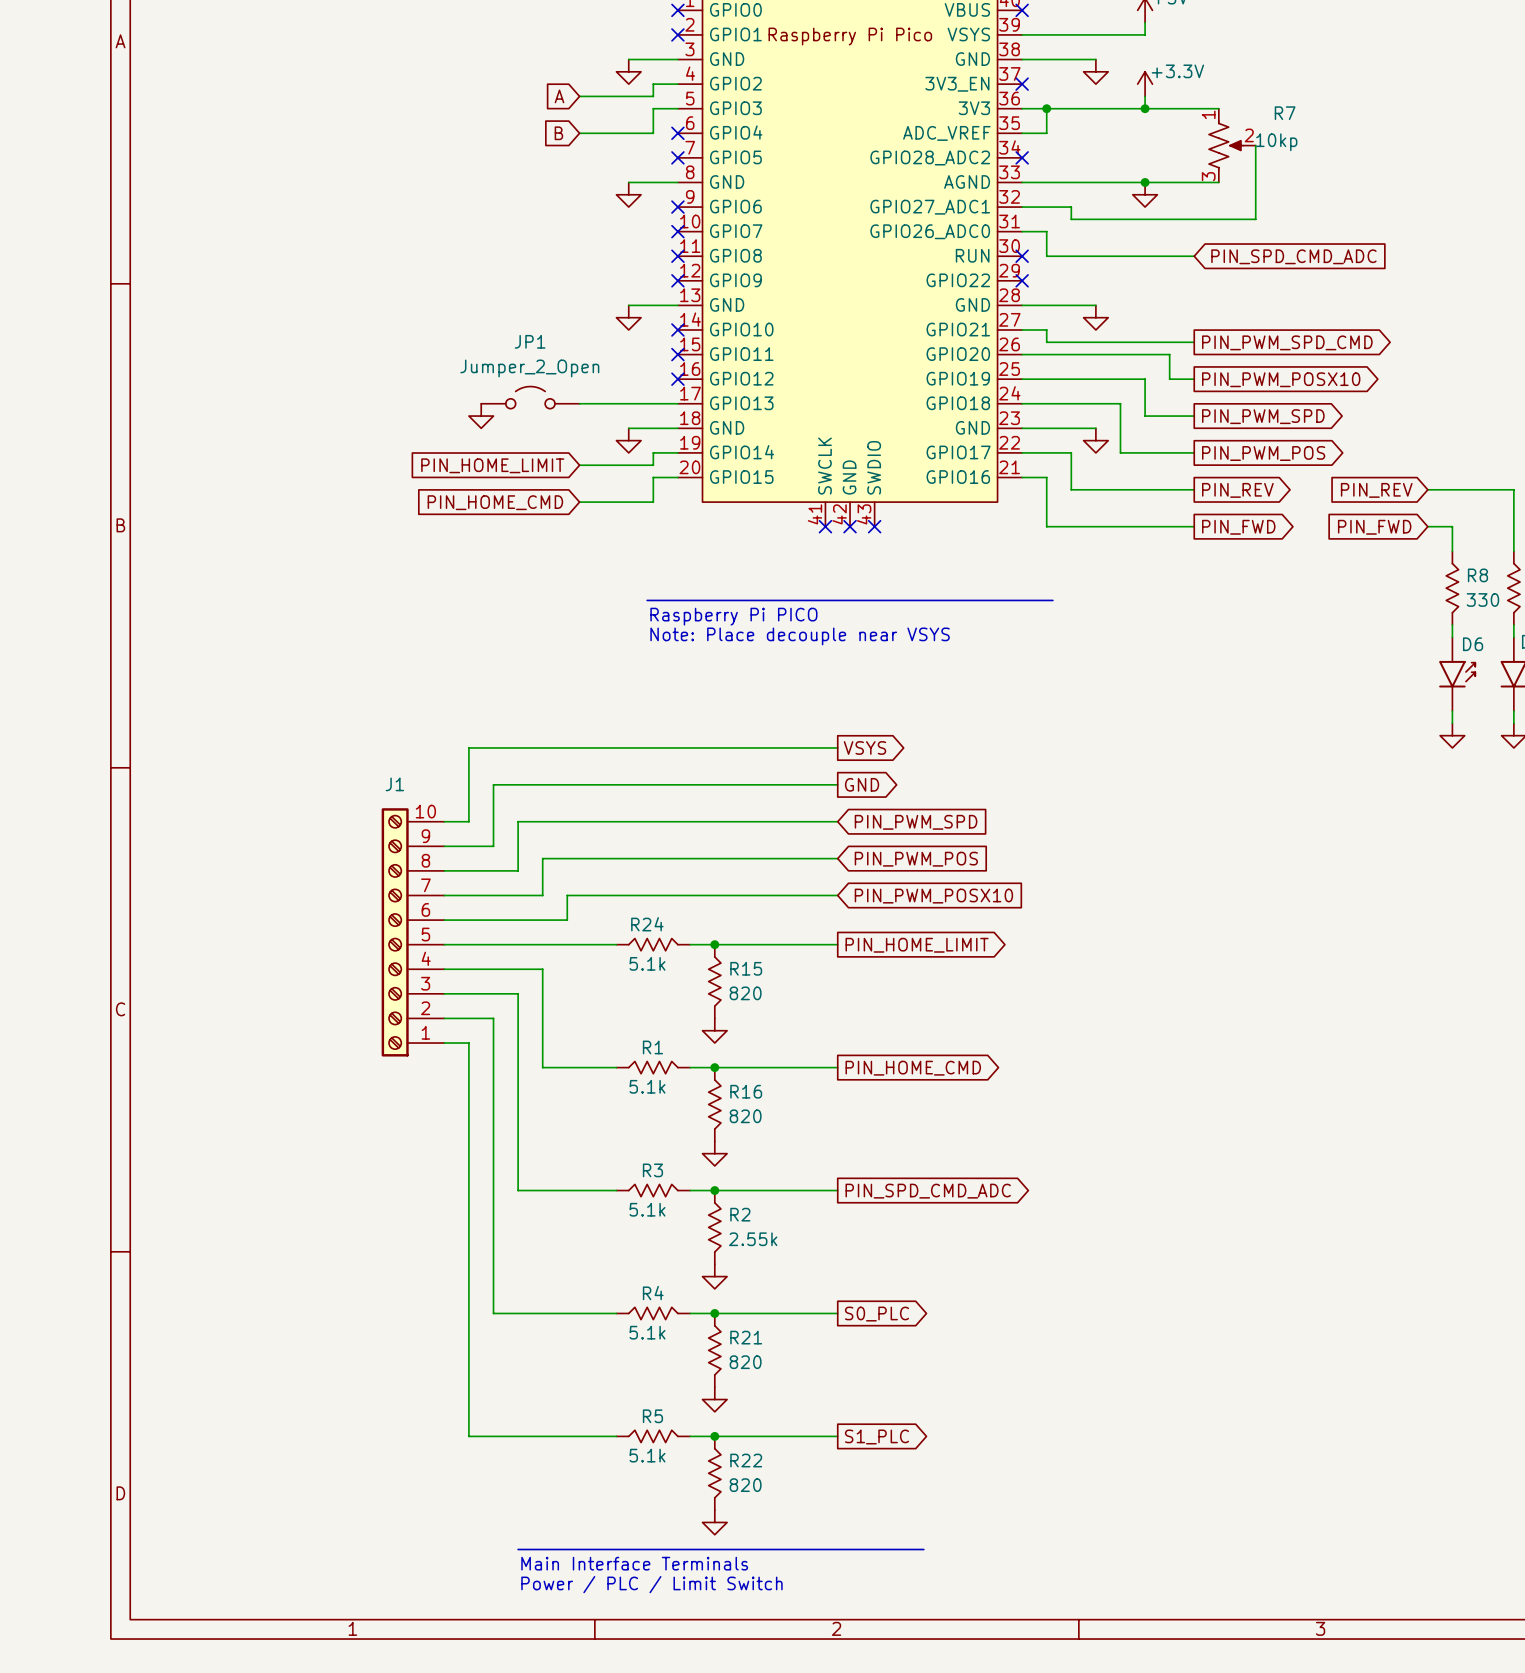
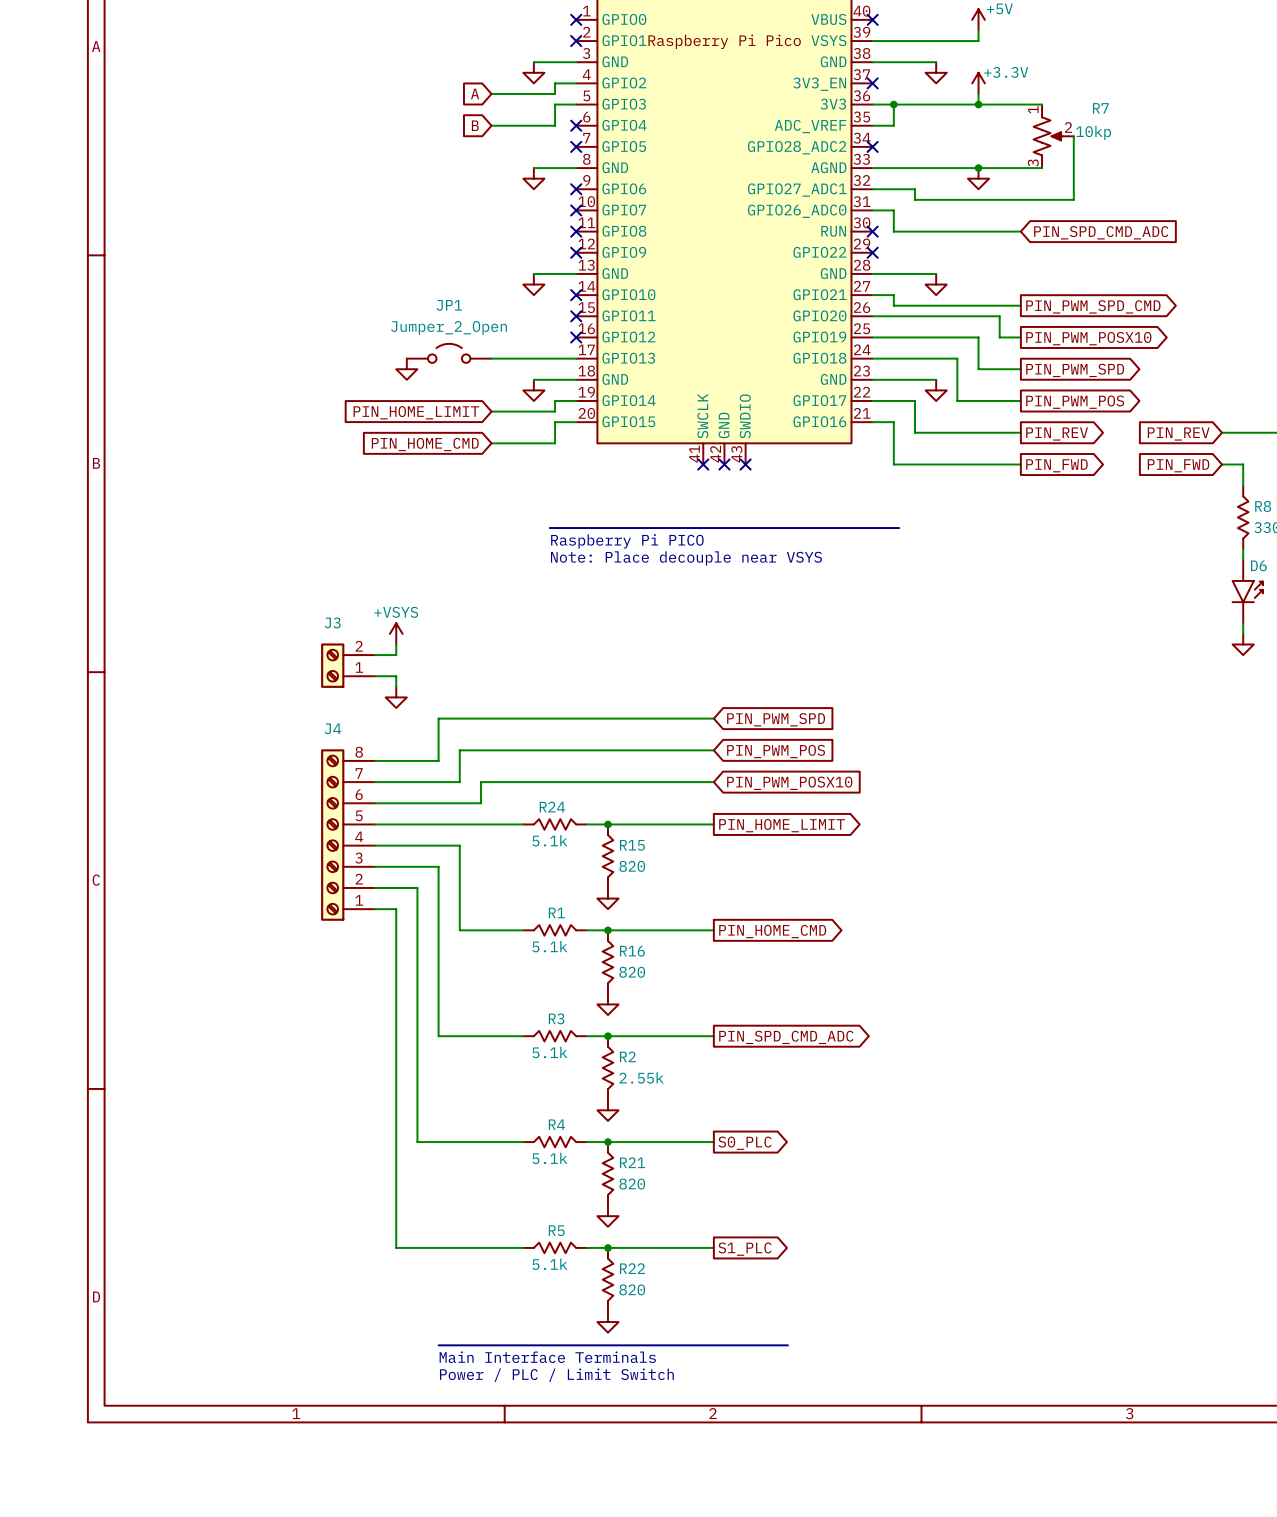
power symbol: none -> +VSYS (396, 633)
wire: none -> (396, 644) (396, 655) (375, 655)
wire: (837, 747) (468, 747) (468, 772) -> (375, 676) (396, 676)
global label: VSYS (864, 747) -> none
J3: none -> (348, 665)
wire: (468, 784) (468, 821) (444, 821) -> none
wire: (837, 784) (493, 784) (493, 846) (444, 846) -> none
global label: GND (862, 784) -> none
power symbol: none -> (396, 697)
J1: (412, 932) -> none
J4: none -> (348, 835)

